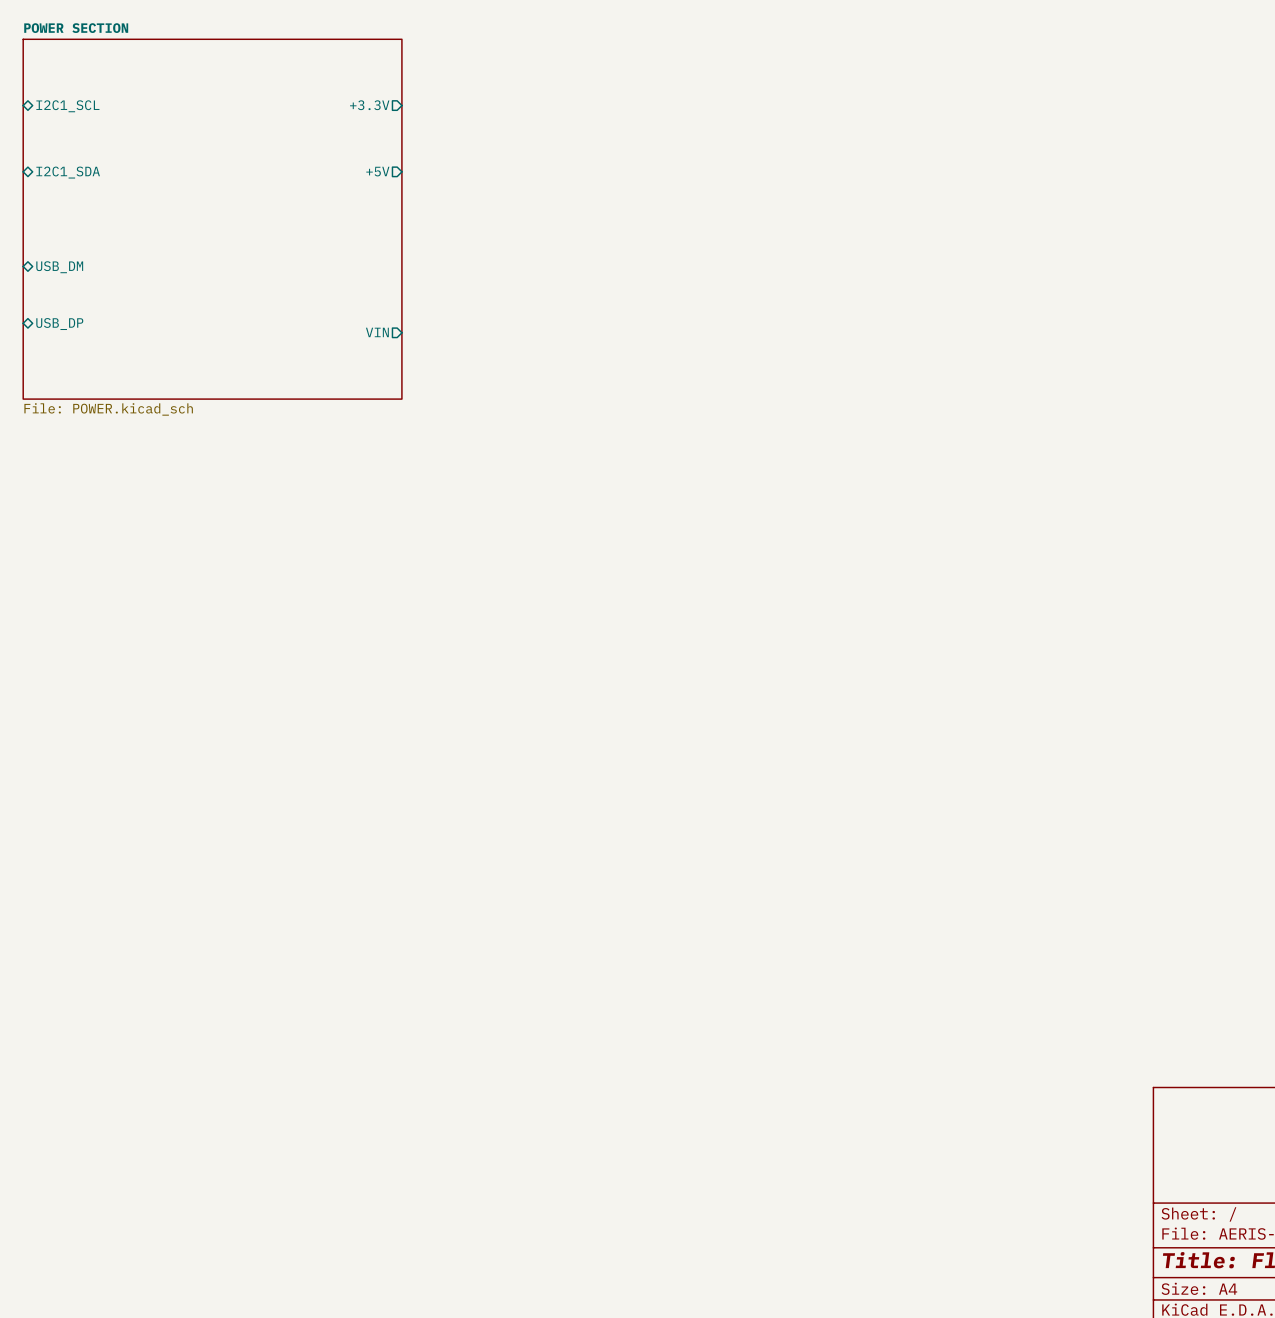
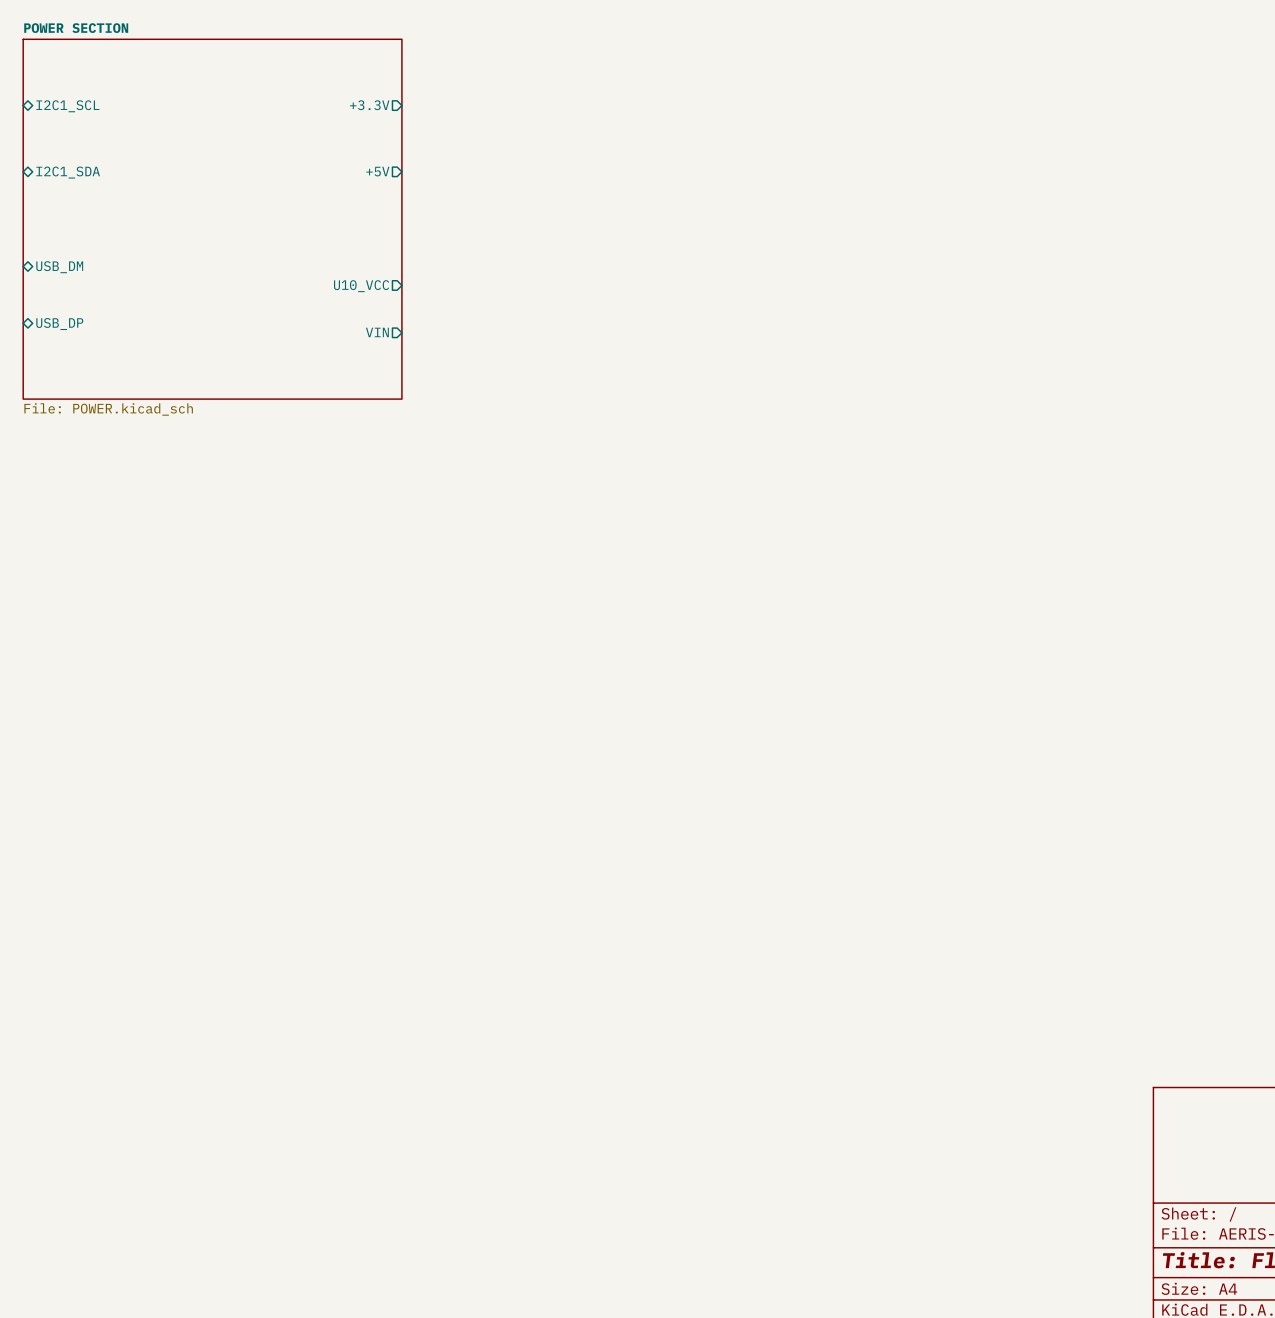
sheet pin: none -> U10_VCC (361, 286)

